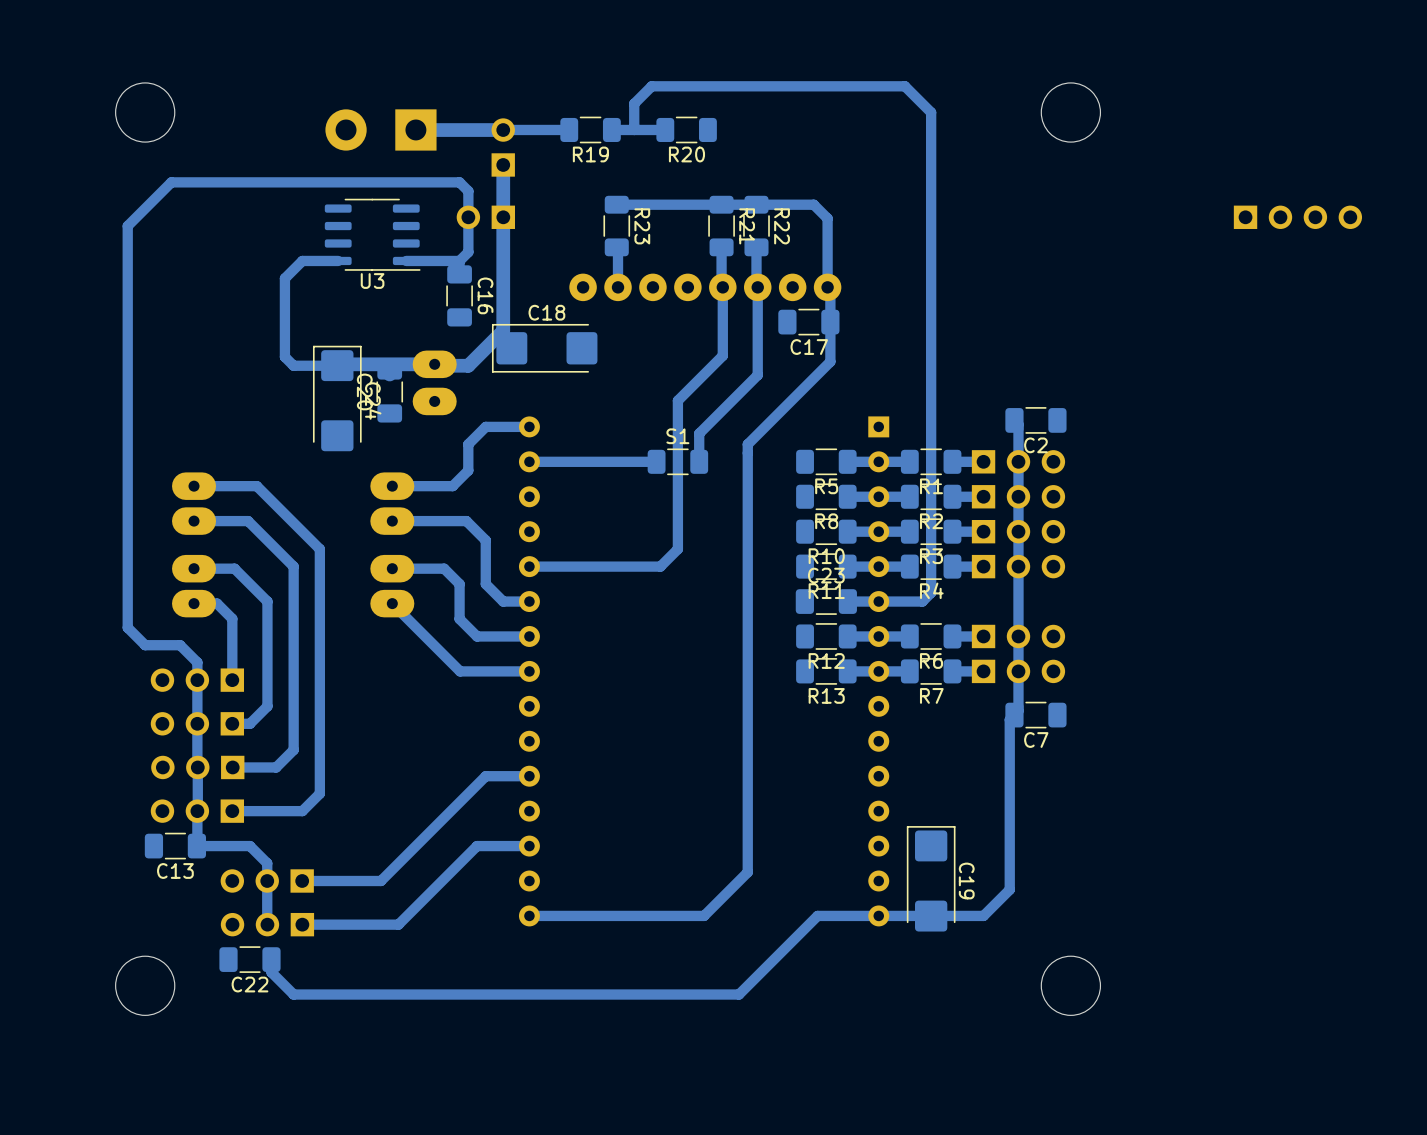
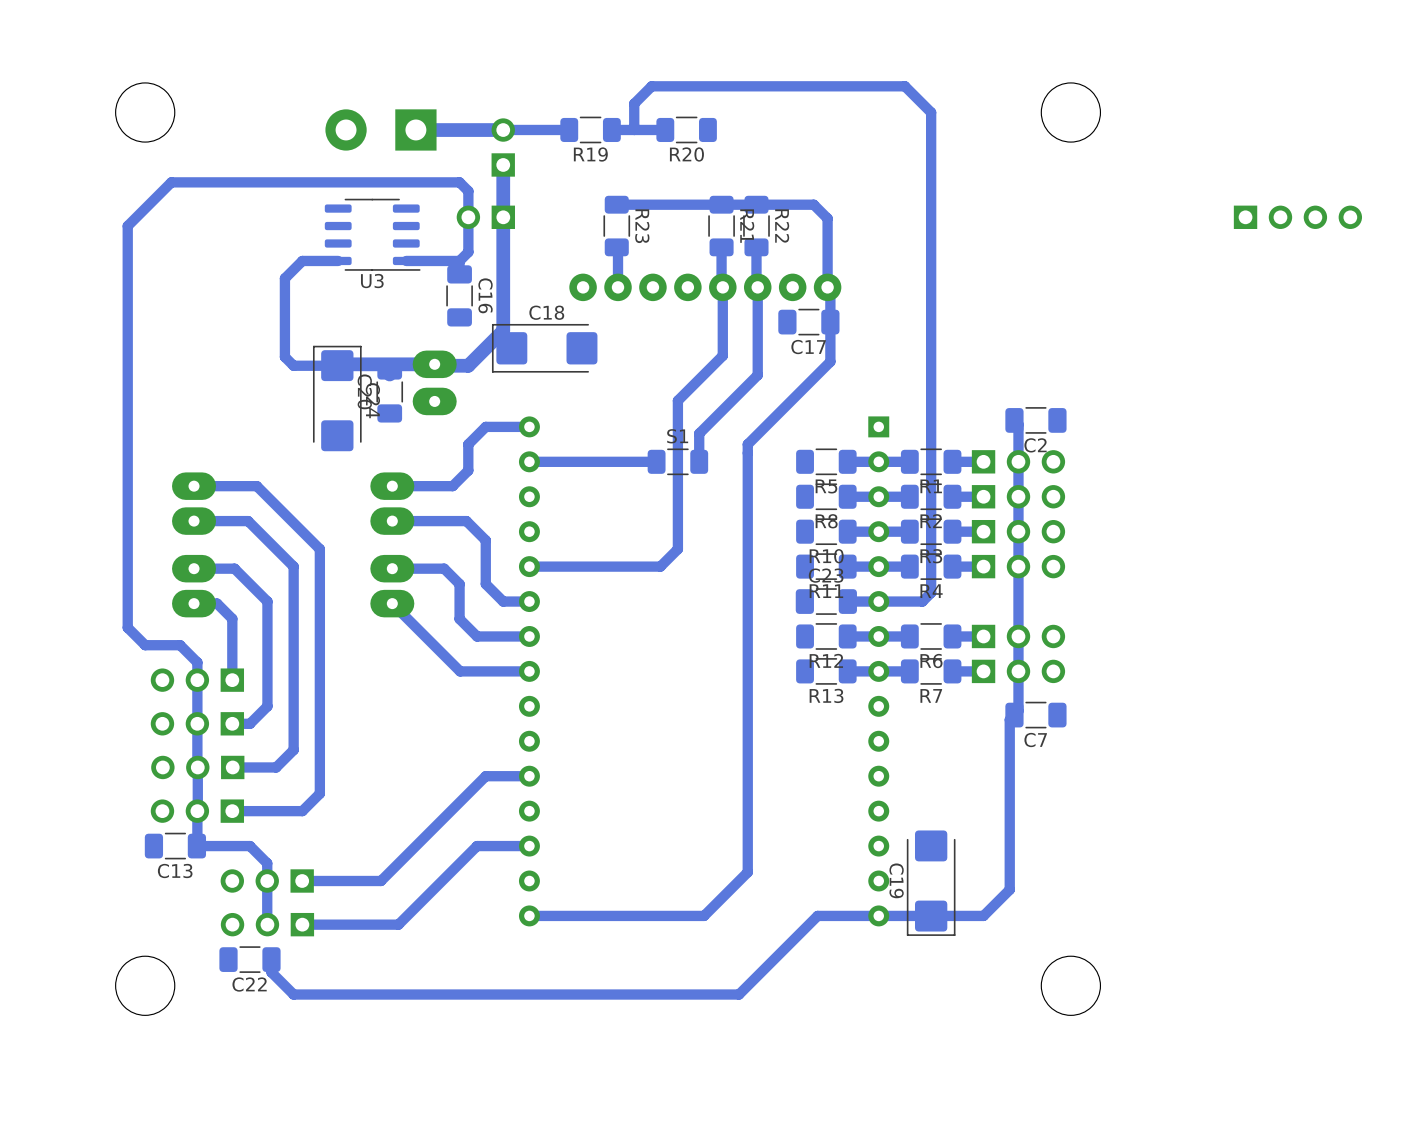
C19 rotation: 0° (931, 878) -> 180° (931, 883)

